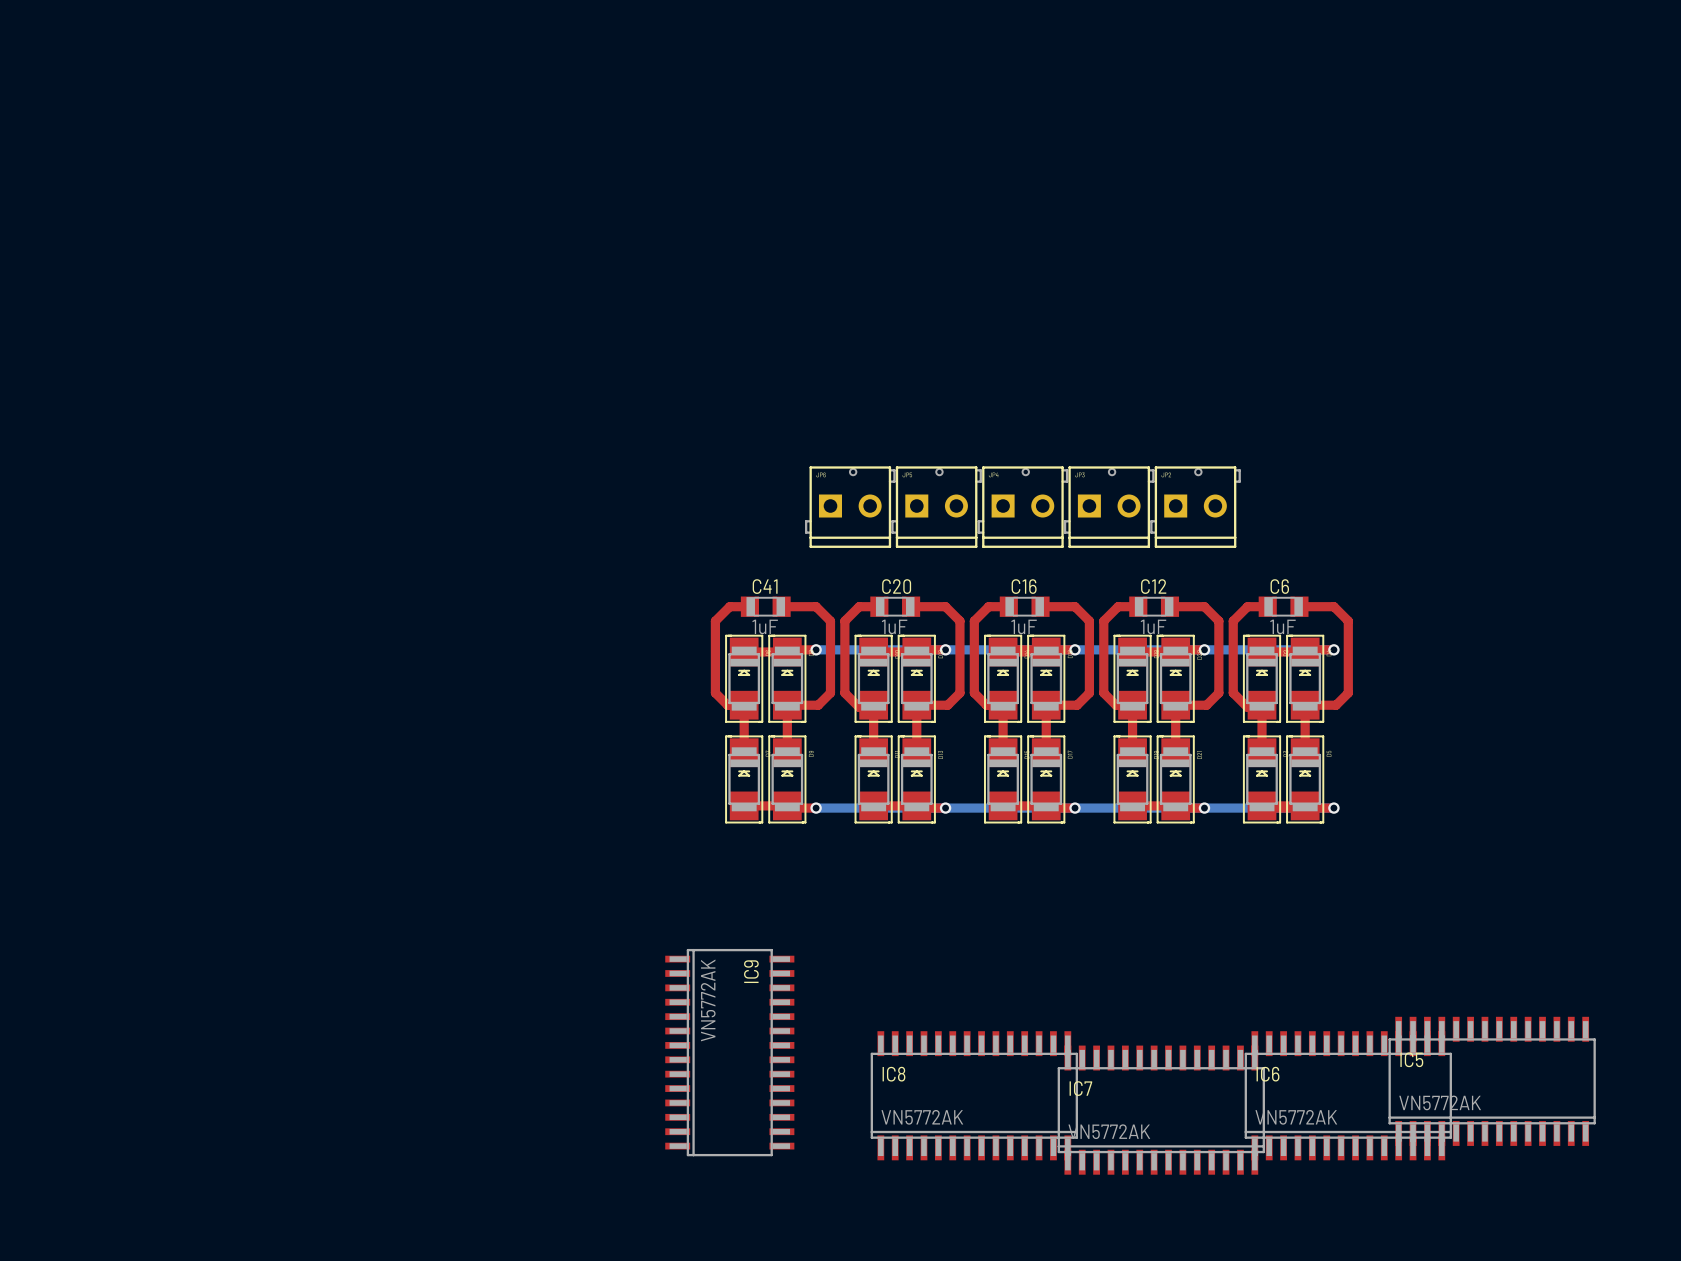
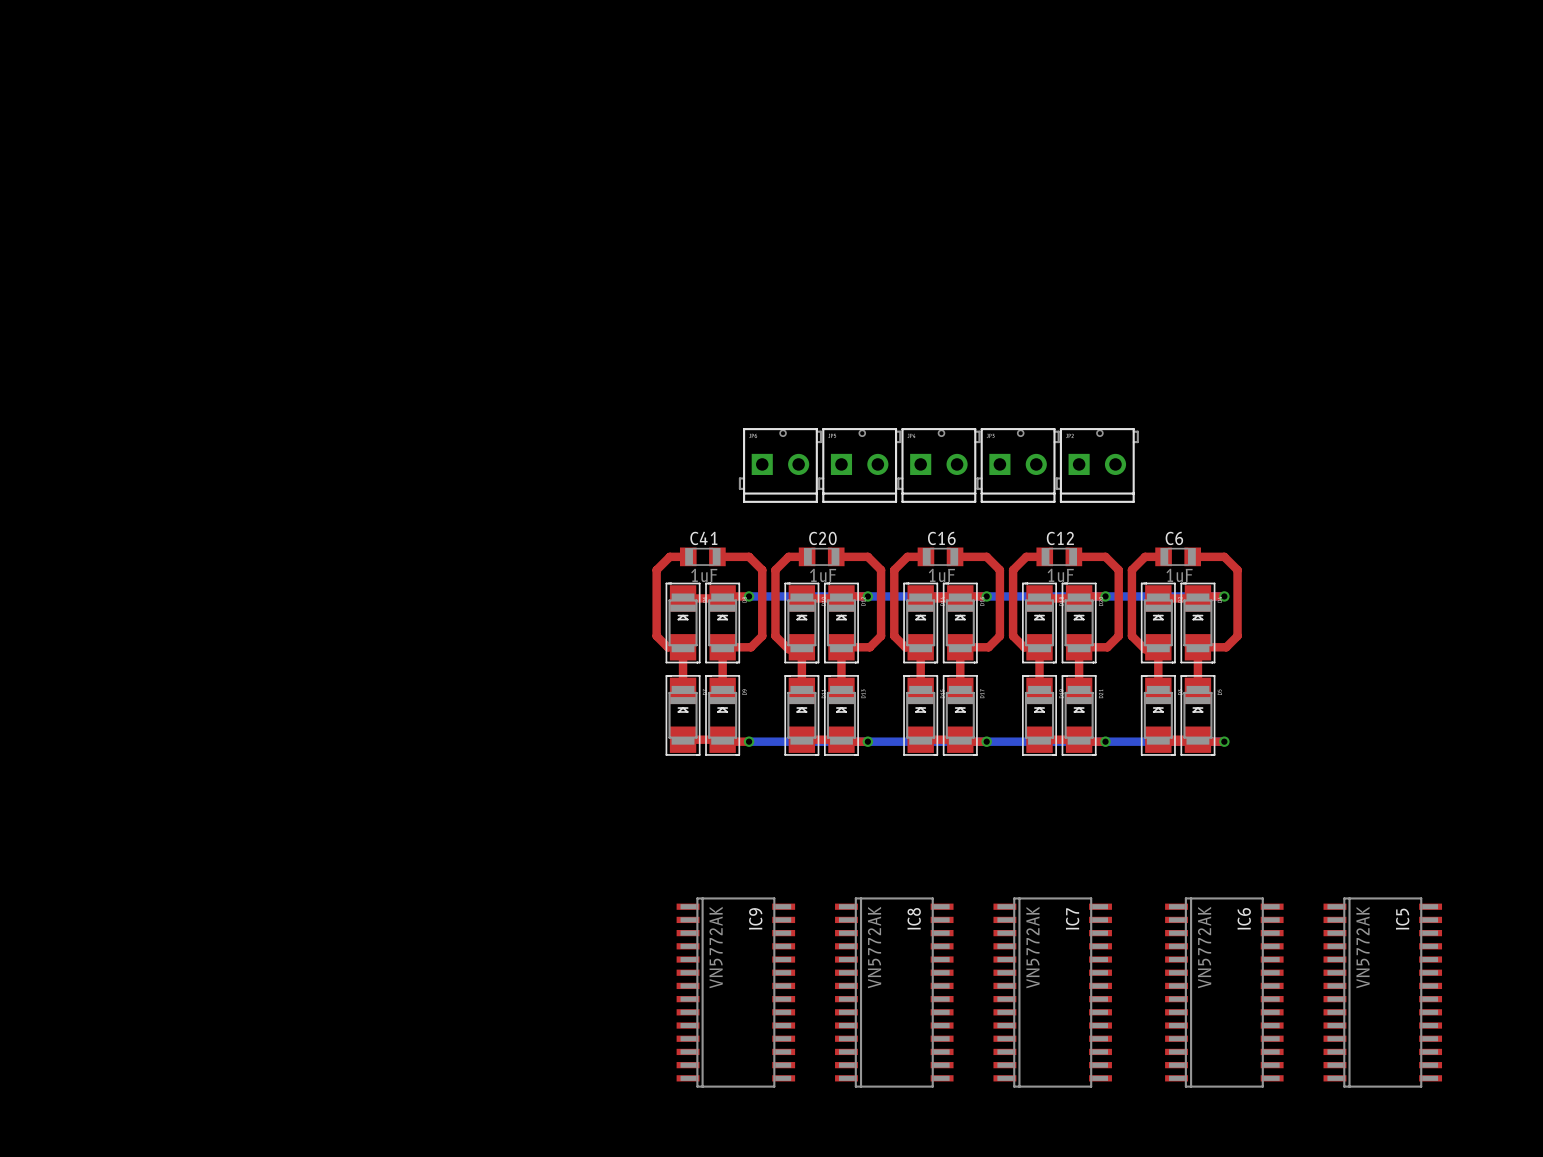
IC9 position: (729, 1052) -> (735, 992)
IC5 rotation: 0° (1492, 1081) -> 90° clockwise (1382, 992)
IC8 rotation: 0° (974, 1095) -> 90° clockwise (894, 992)
IC6 rotation: 0° (1348, 1095) -> 90° clockwise (1224, 992)
IC7 rotation: 0° (1161, 1110) -> 90° clockwise (1052, 992)

